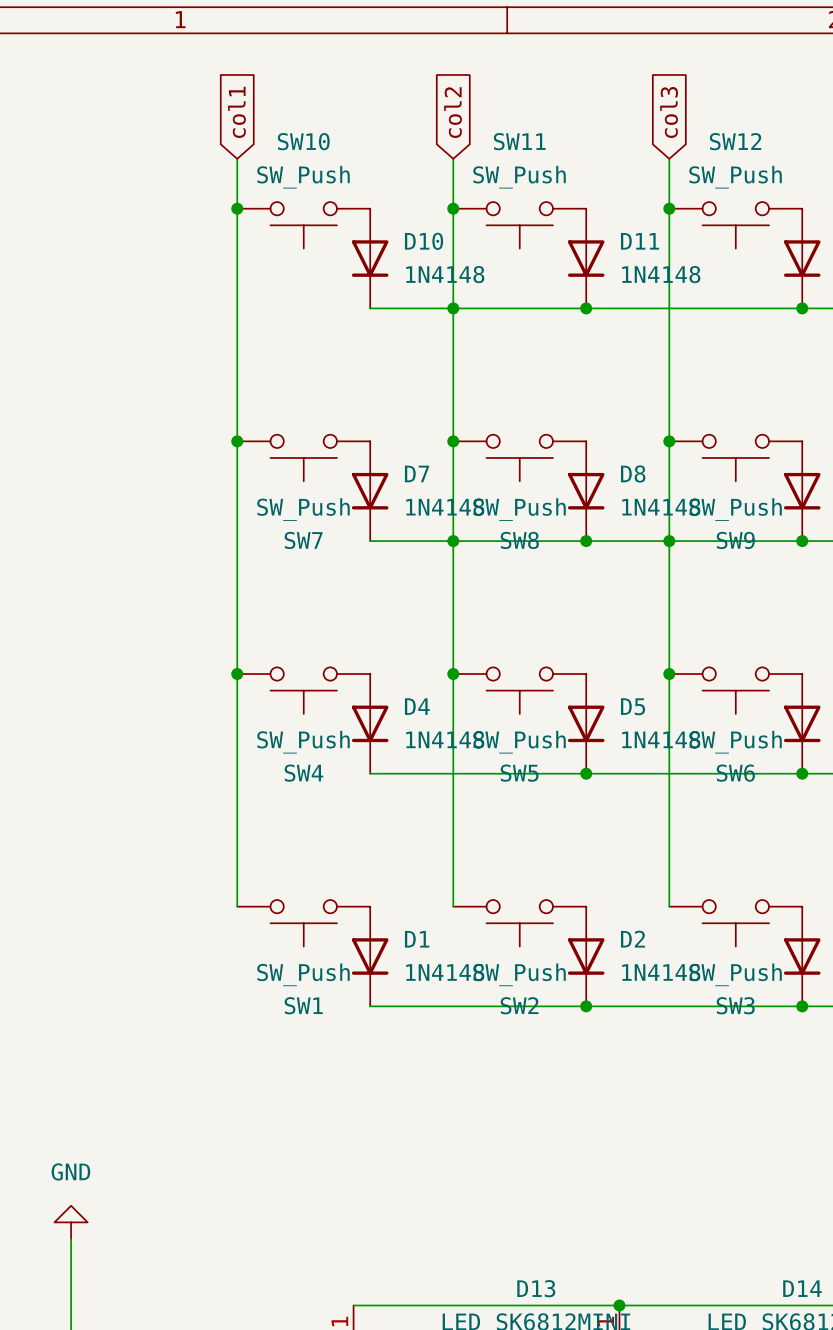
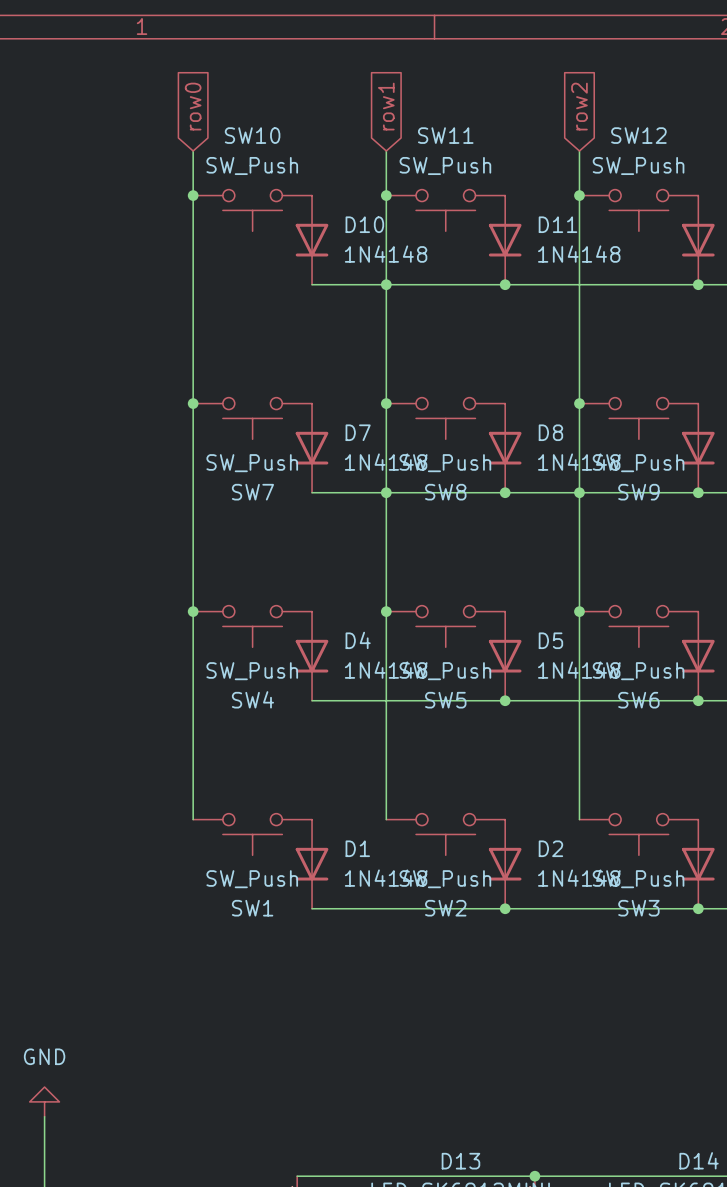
global label: col1 (237, 112) -> row0 (193, 106)
global label: col2 (453, 112) -> row1 (386, 106)
global label: col3 (669, 112) -> row2 (579, 106)

